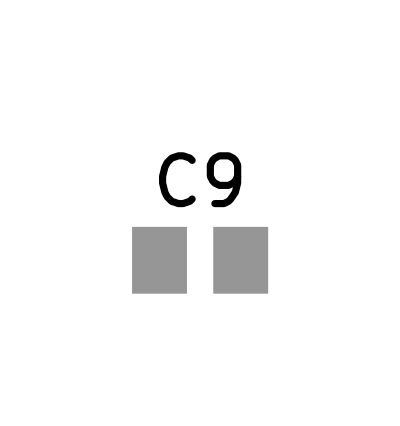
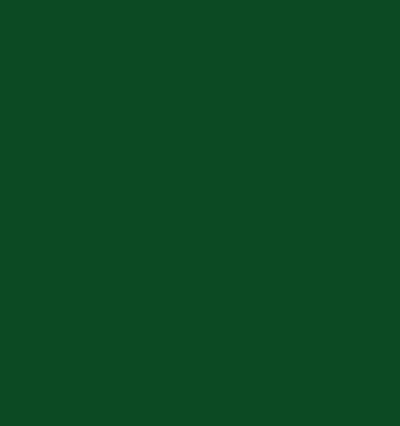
C9: (200, 260) -> none

